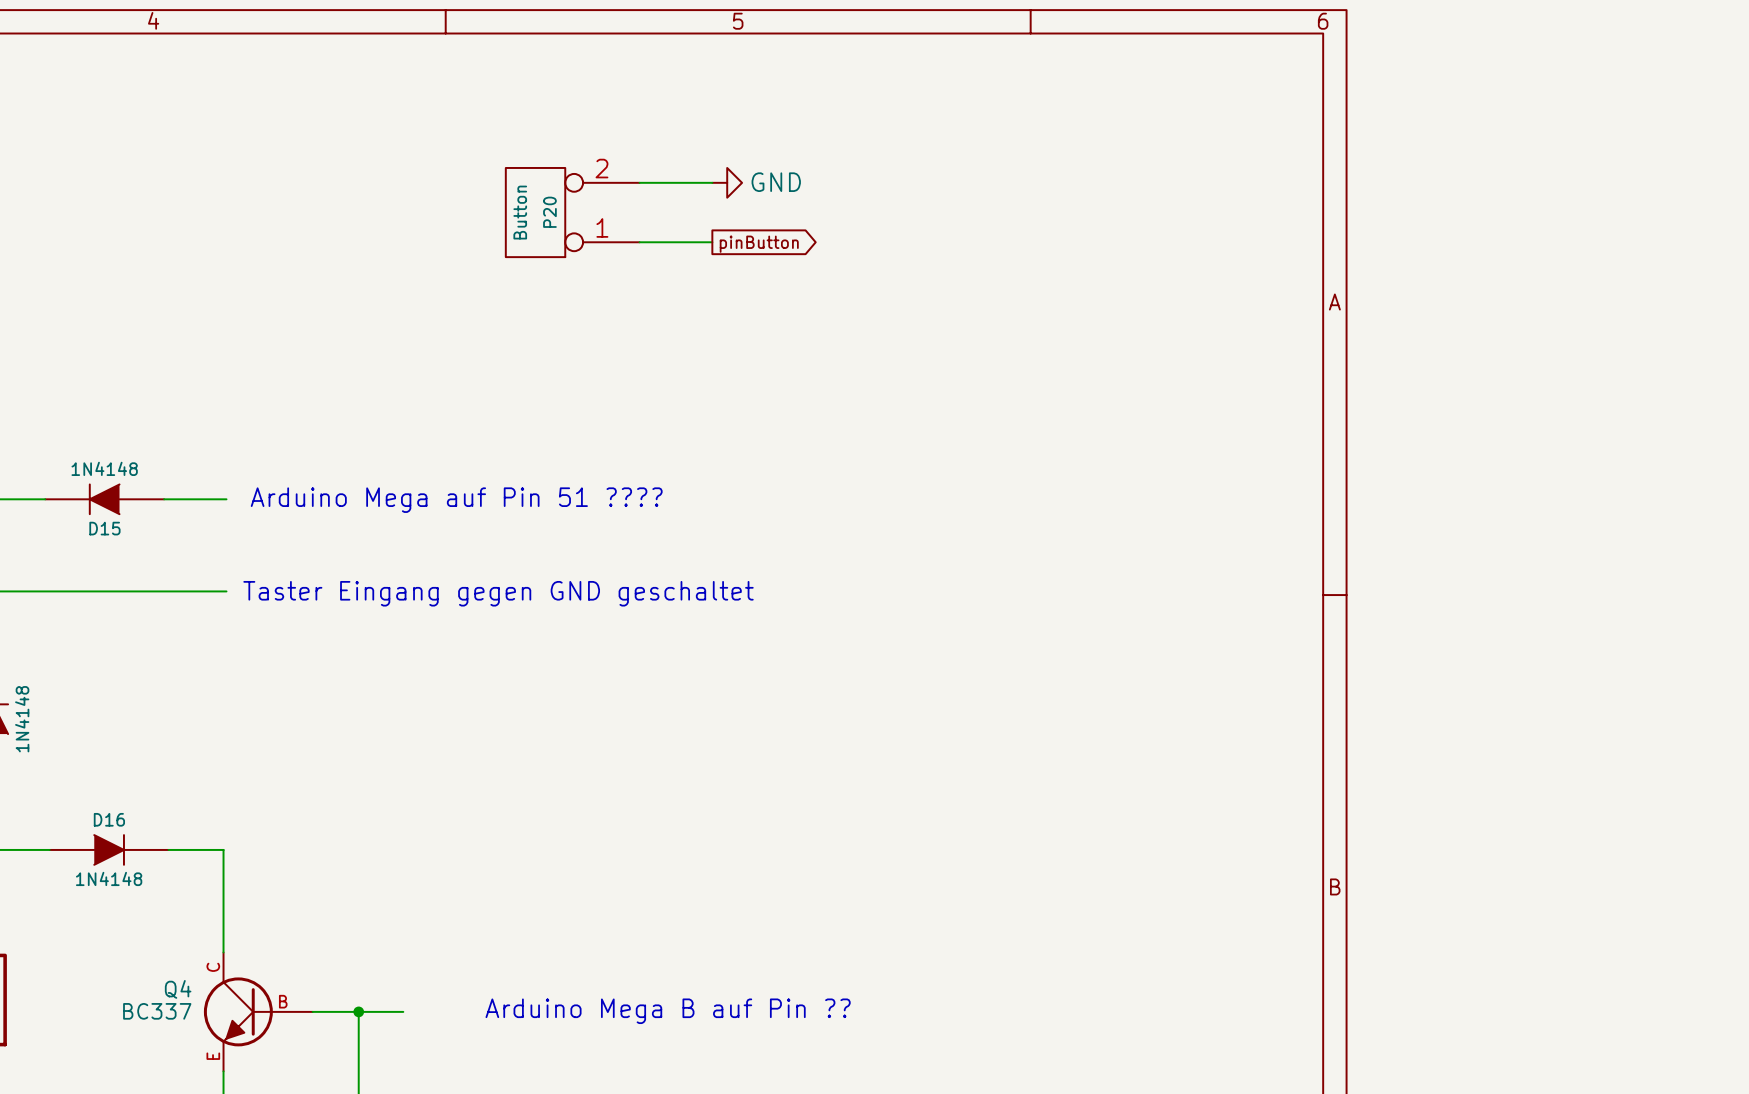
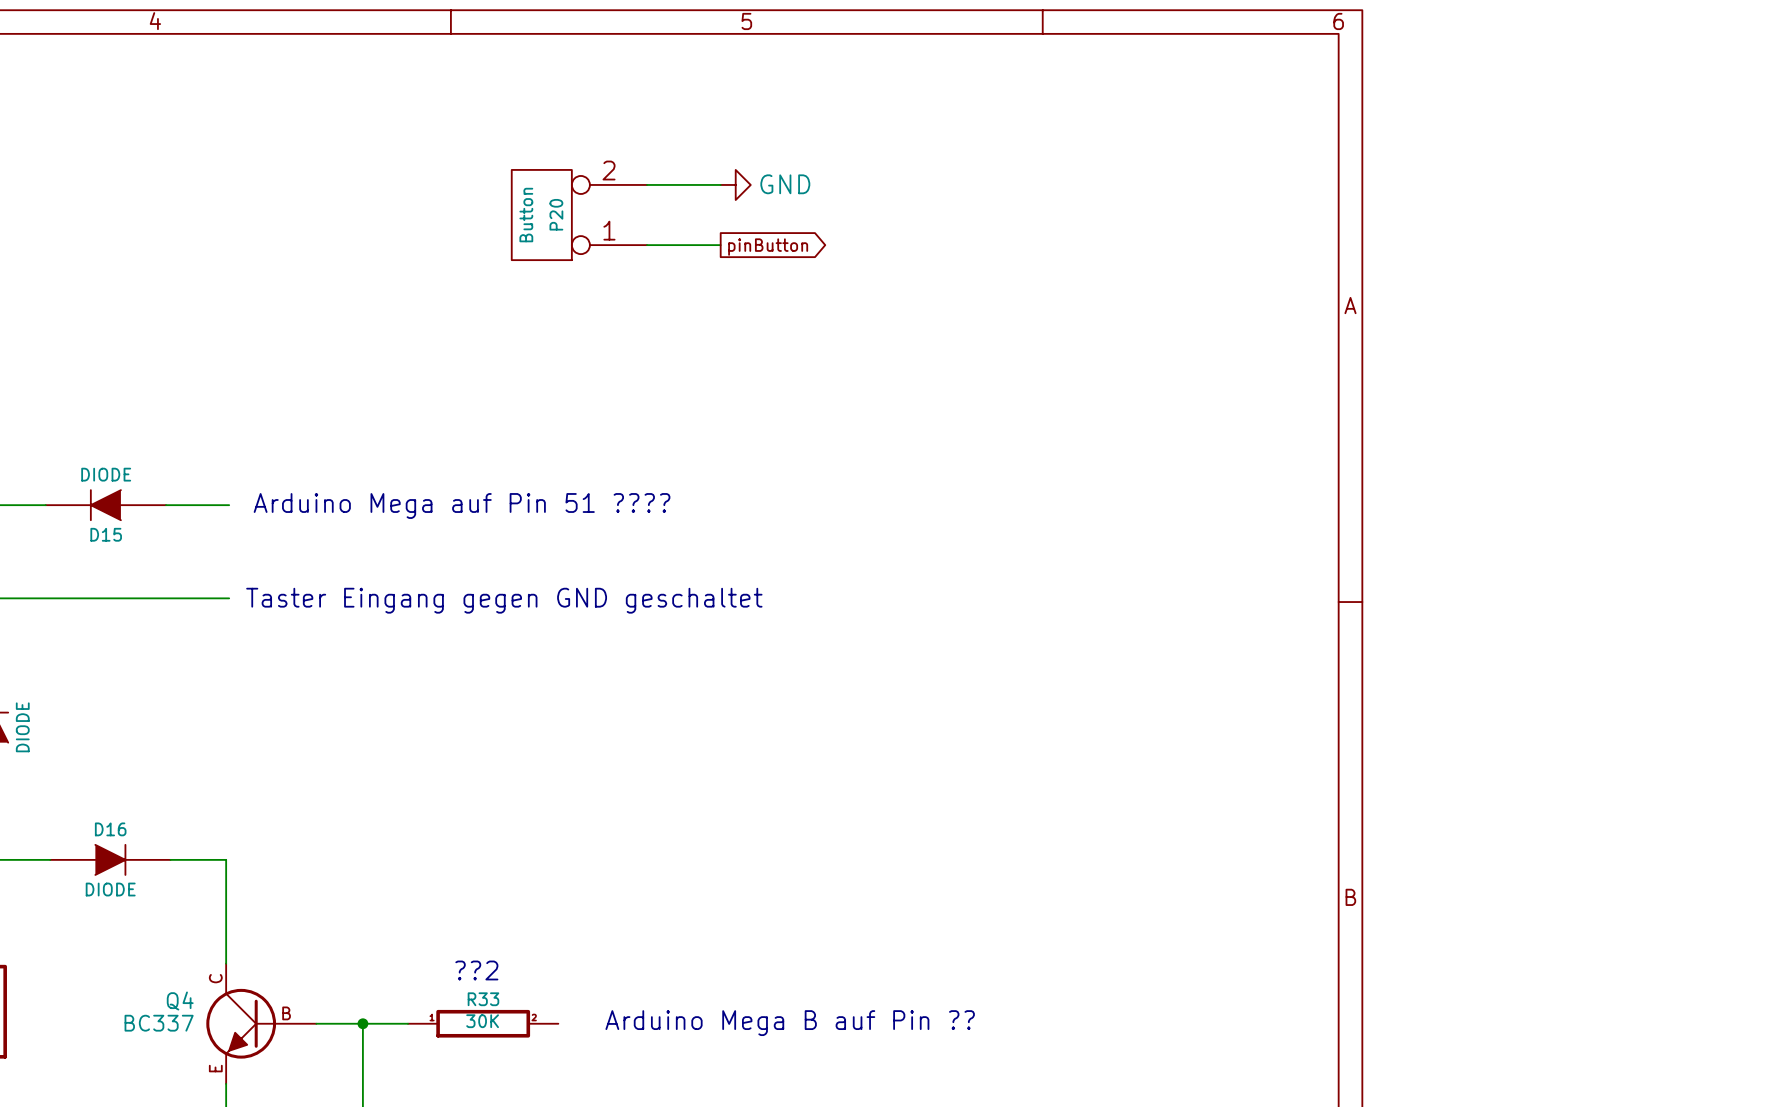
D15 value: 1N4148 (104, 468) -> DIODE (106, 474)
part value: 1N4148 (22, 719) -> DIODE (22, 727)
D16 value: 1N4148 (109, 878) -> DIODE (110, 889)
text: none -> ??2 (476, 970)
R33: none -> 30K (483, 1023)
text position: Arduino Mega B auf Pin ?? (668, 1011) -> Arduino Mega B auf Pin ?? (790, 1023)

